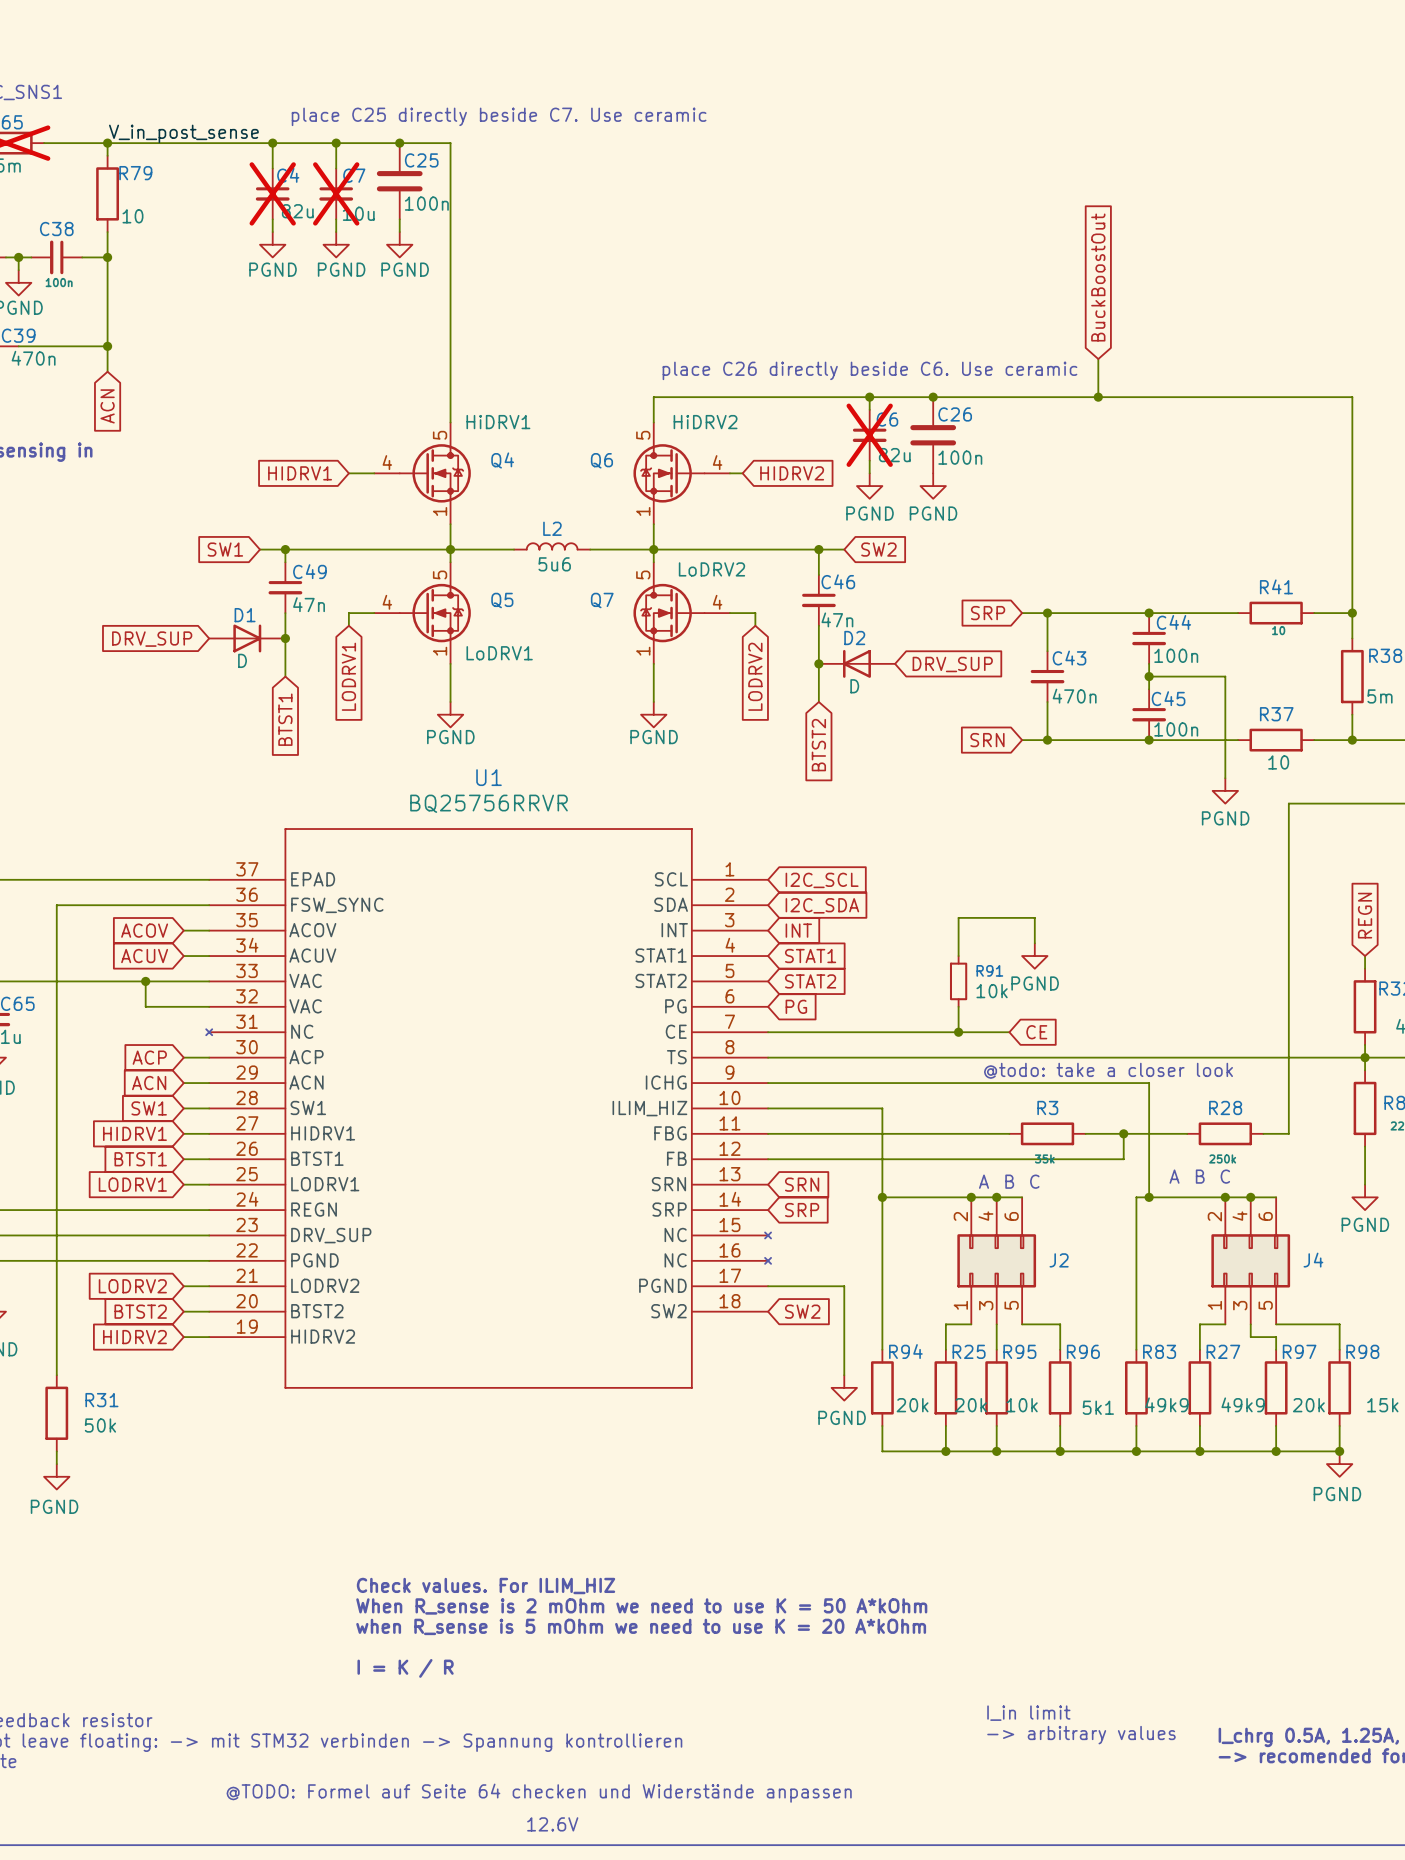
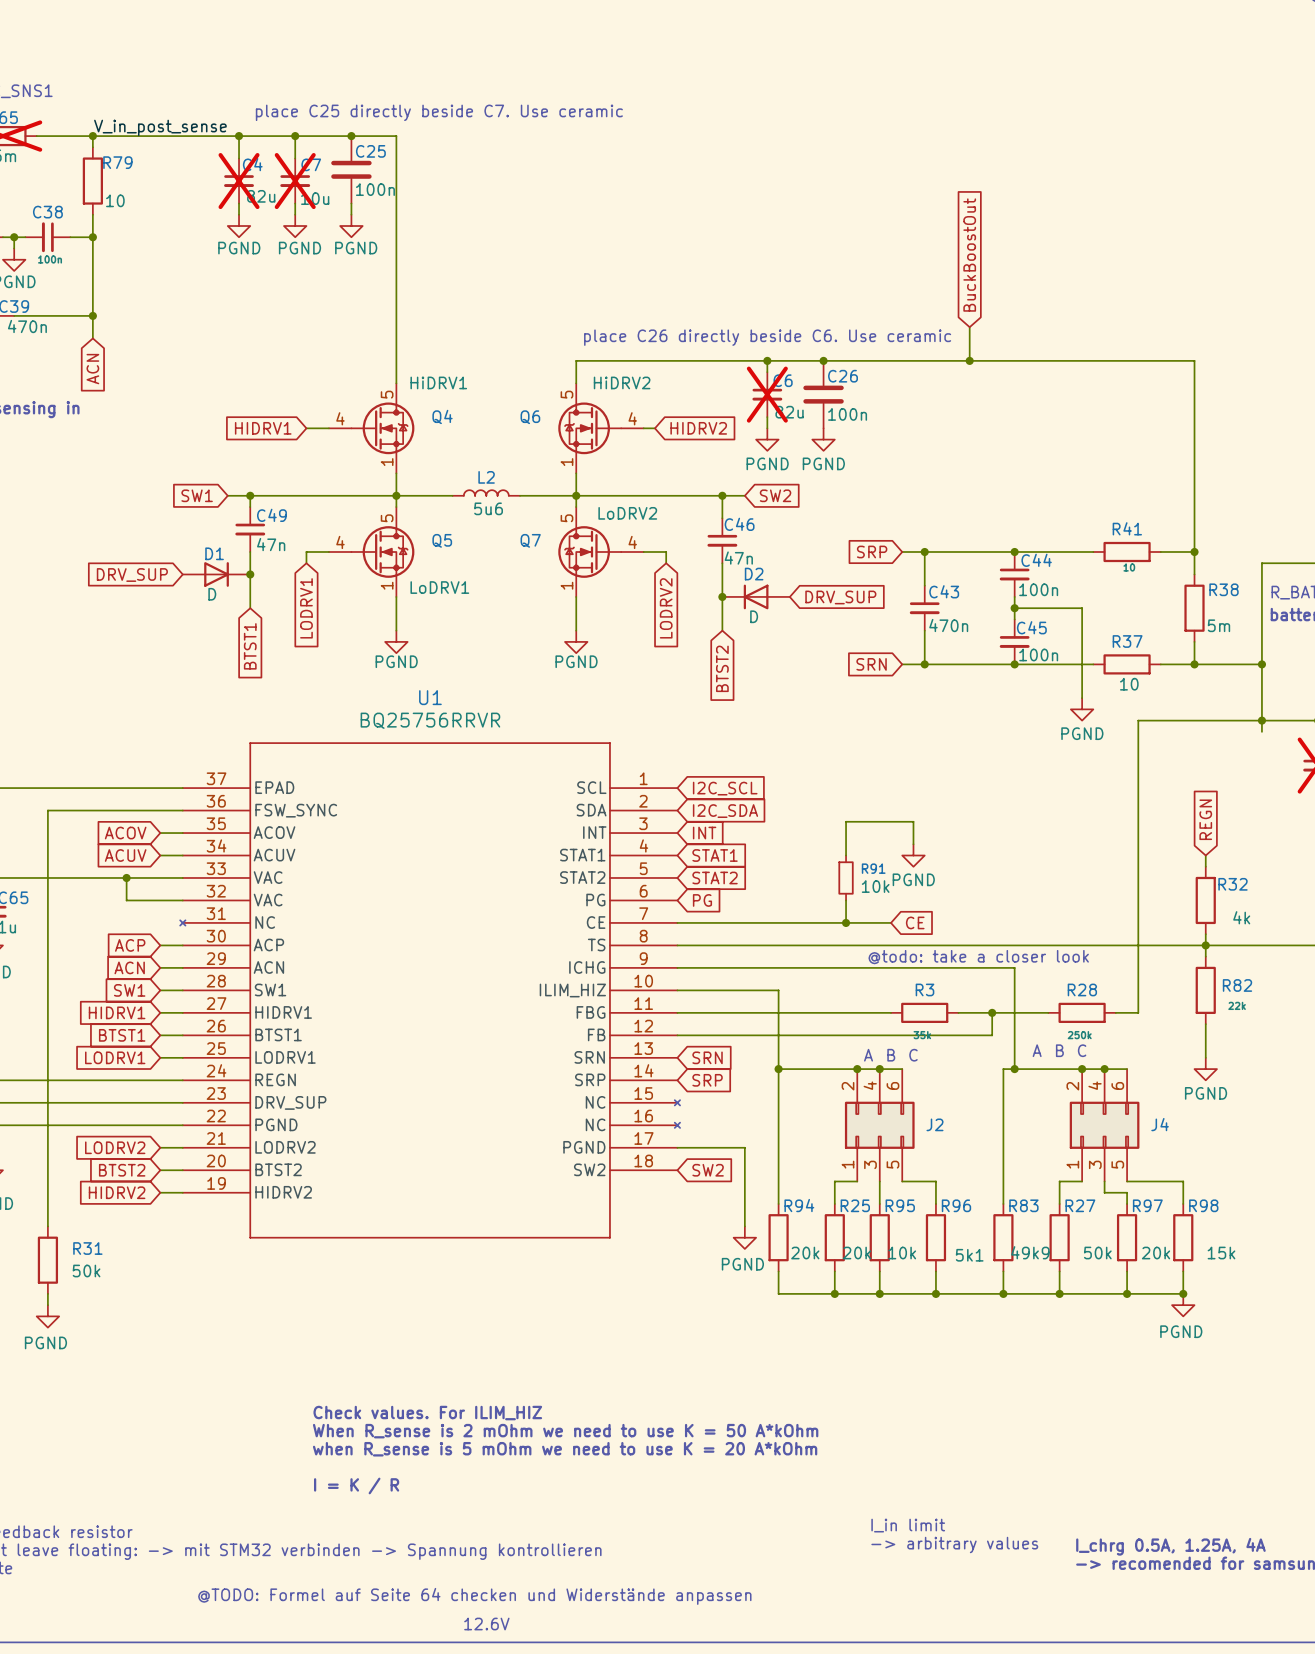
R27 value: 49k9 (1243, 1404) -> 50k (1097, 1253)

